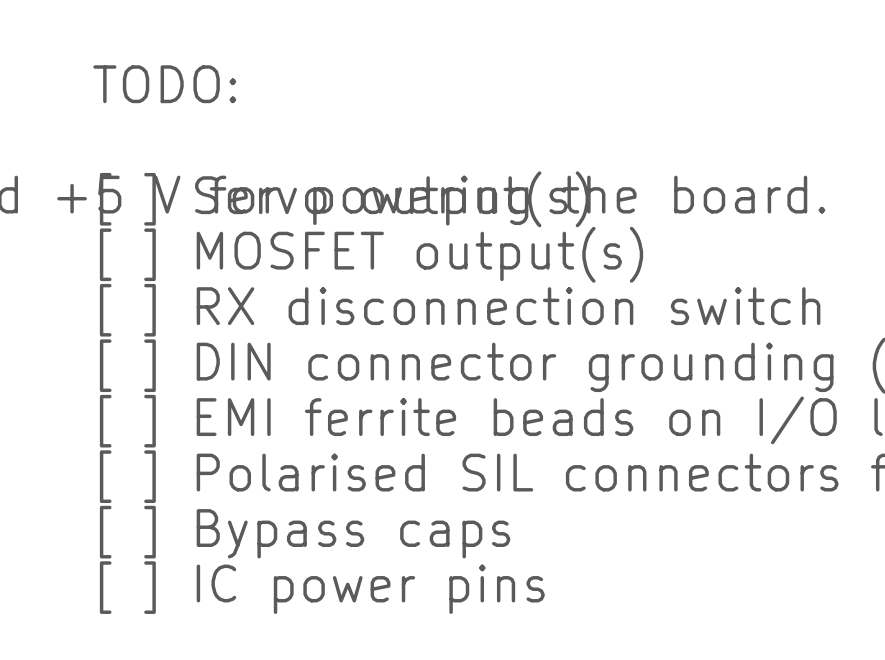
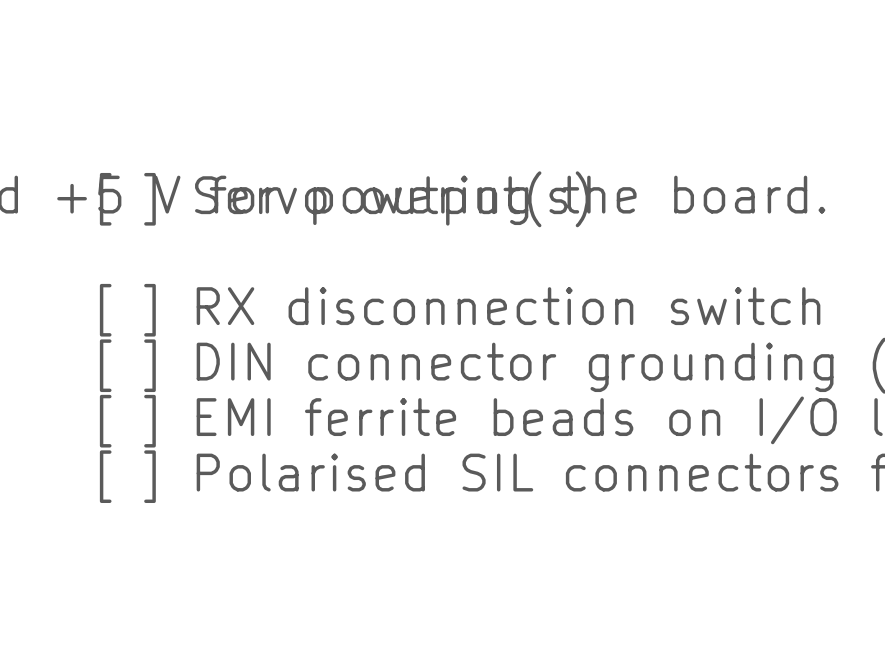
text: TODO: (164, 84) -> none
text: [ ] MOSFET output(s) (371, 254) -> none
text: [ ] Bypass caps (305, 532) -> none
text: [ ] IC power pins (322, 587) -> none

